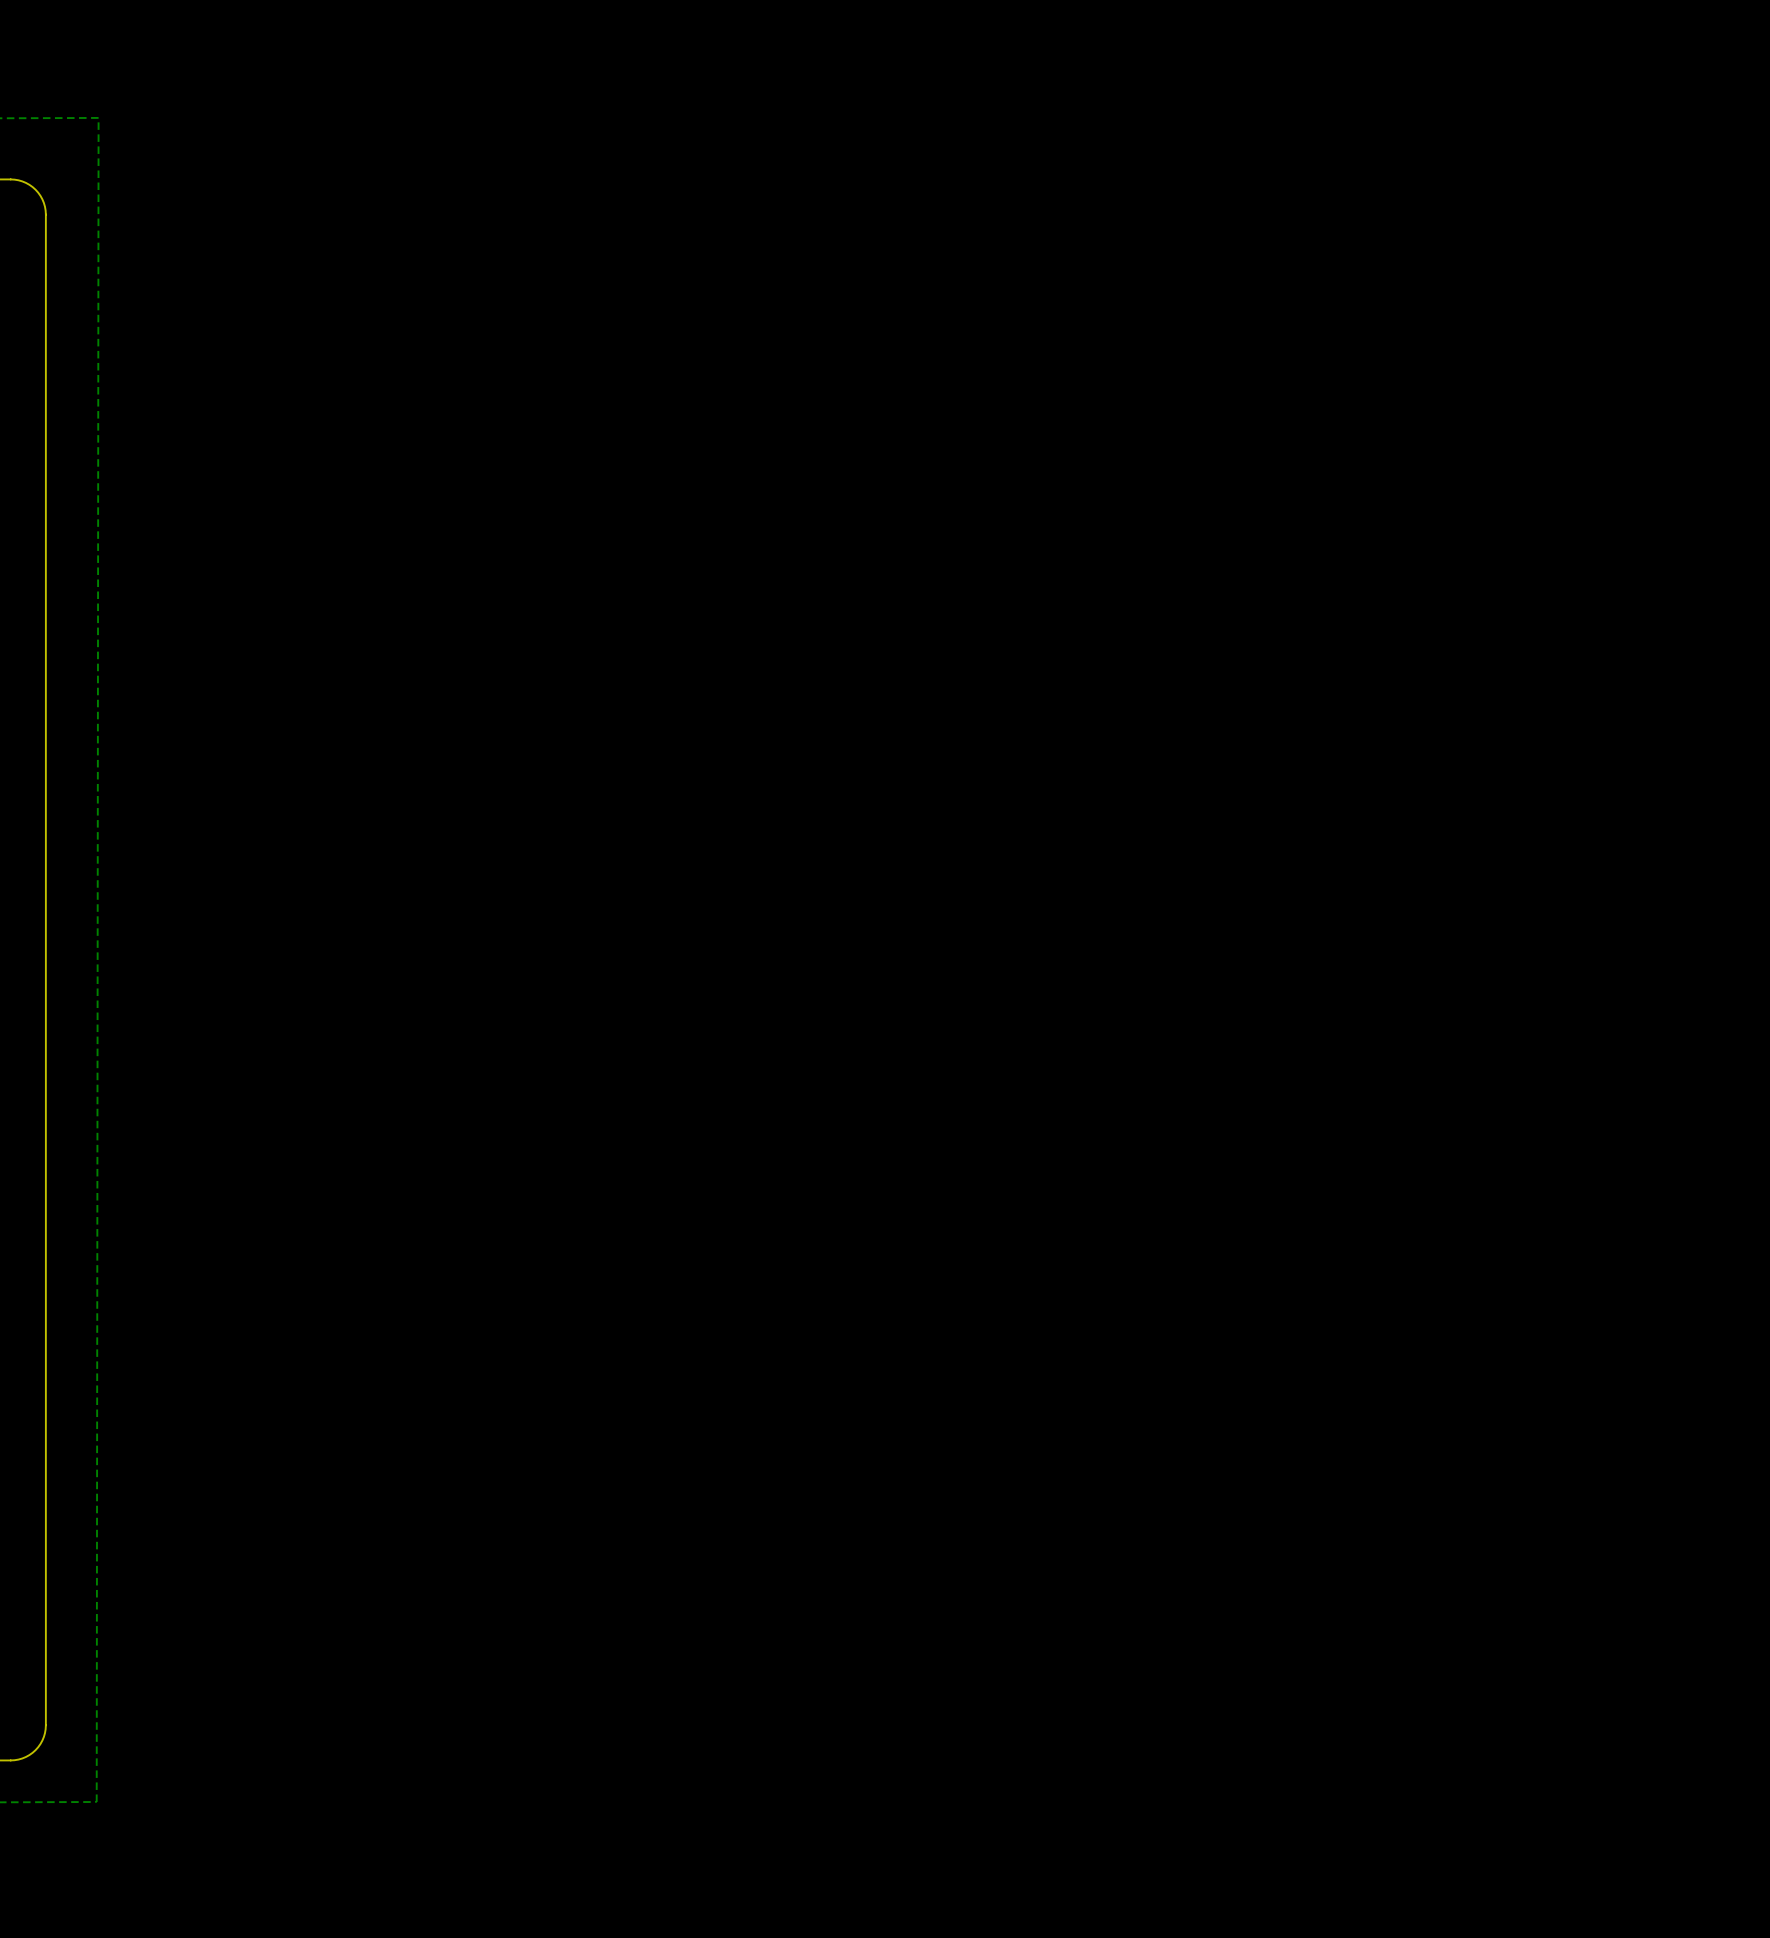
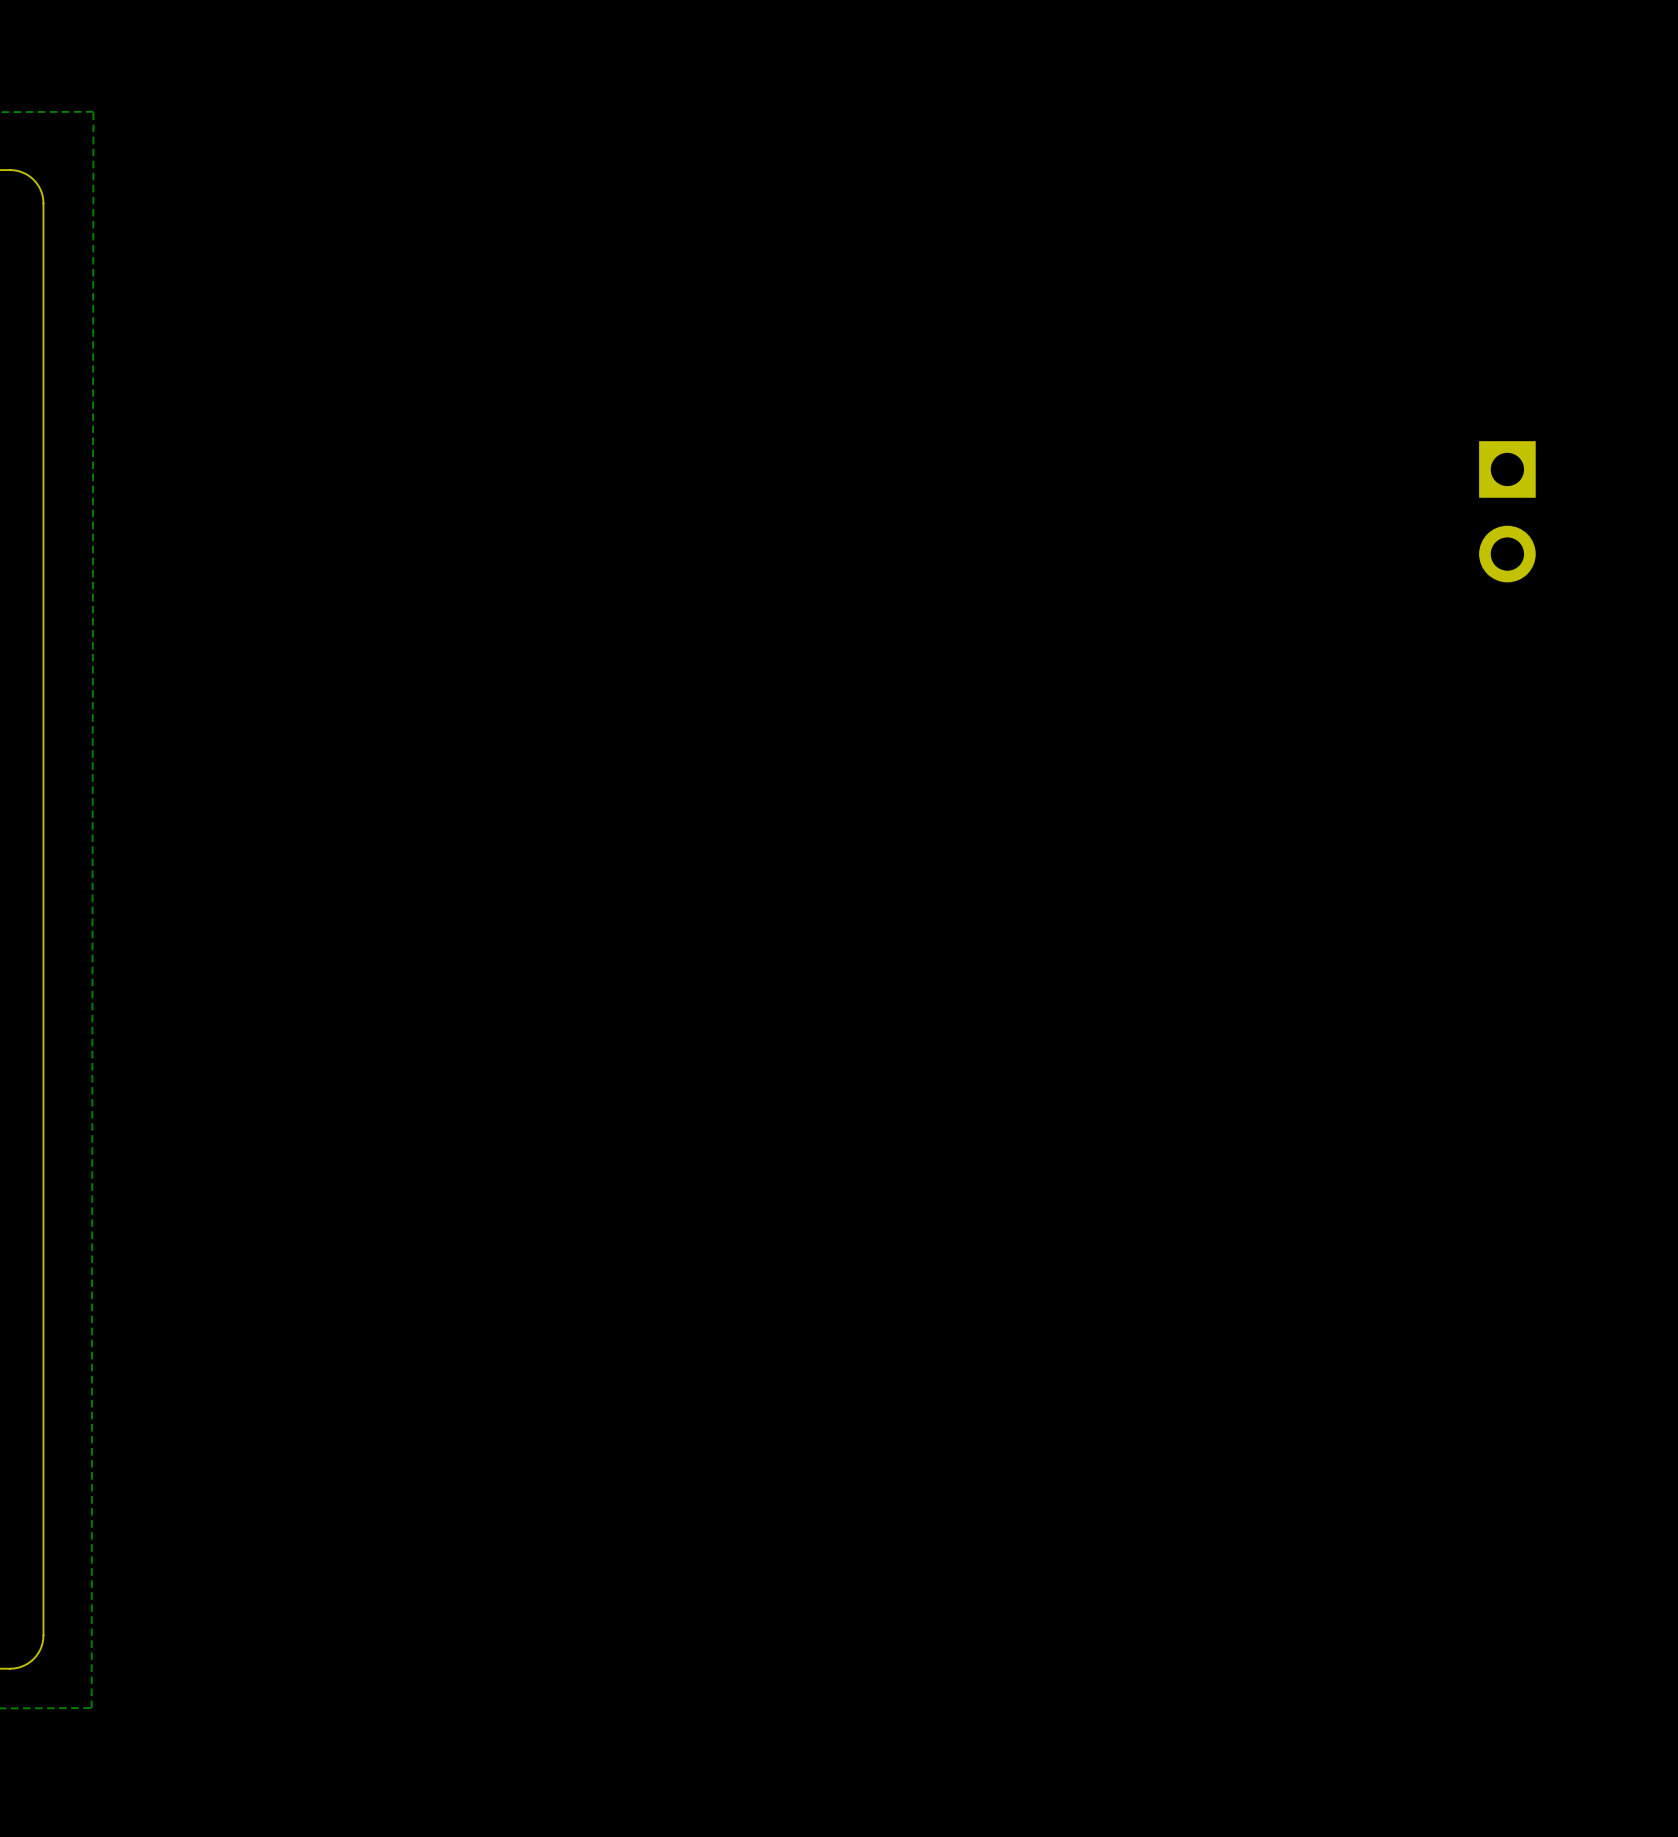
part: none -> (1507, 511)

